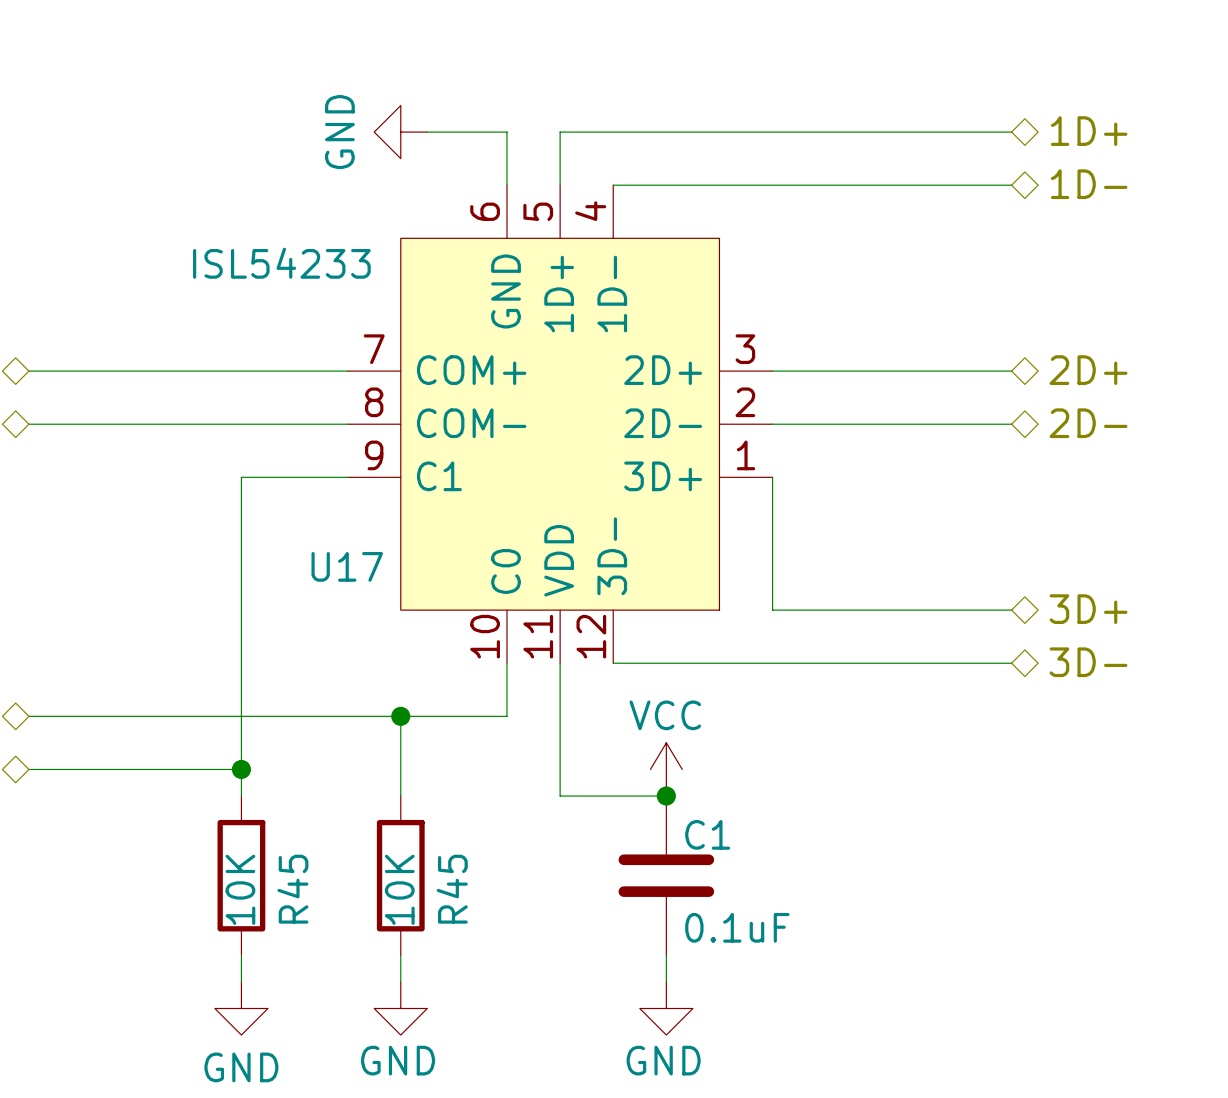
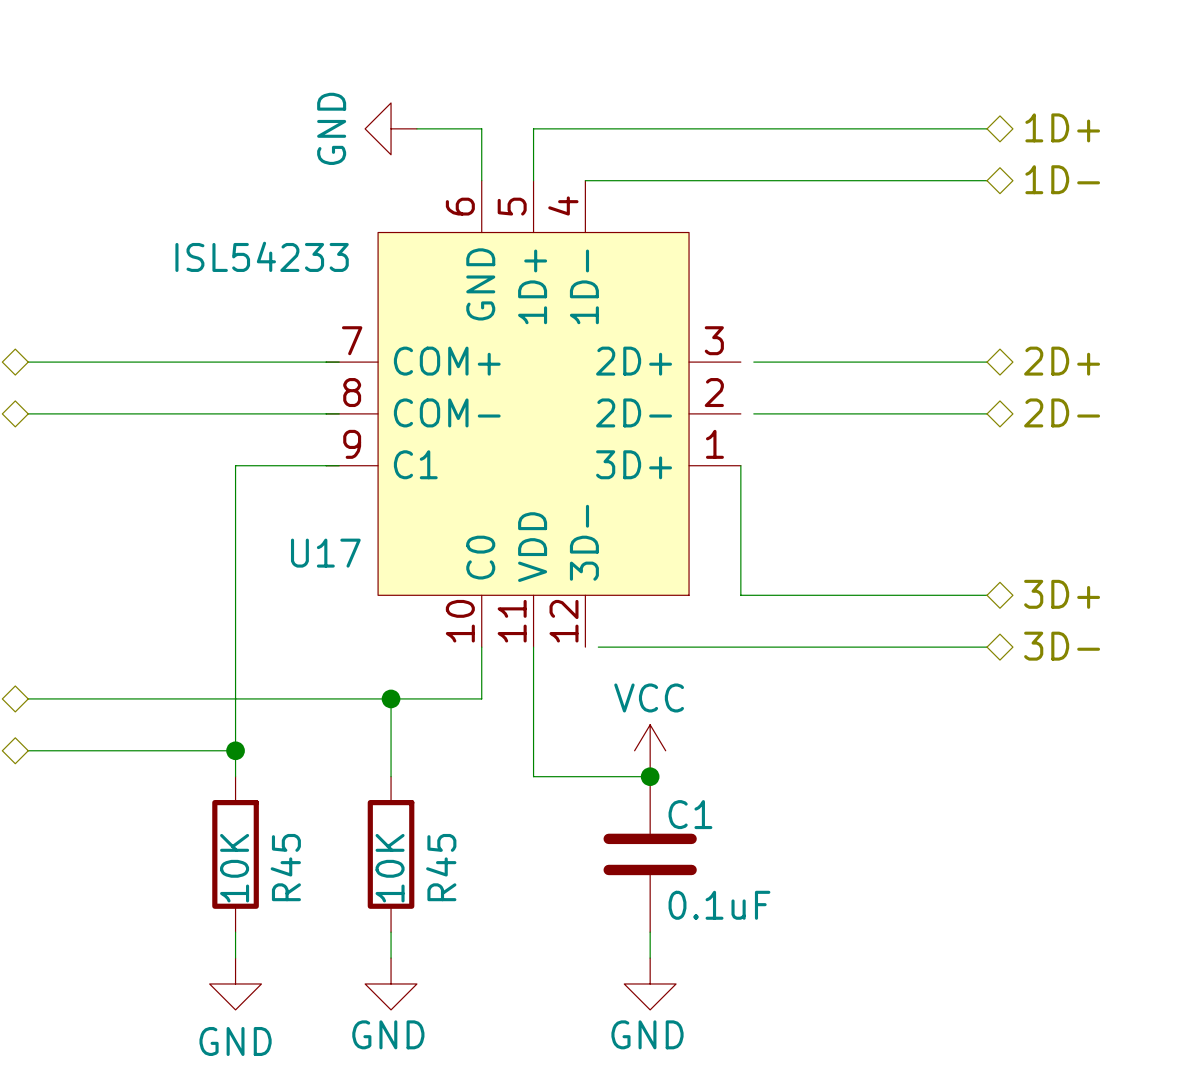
wire: (493, 132) (507, 132) (507, 185) -> (481, 128) (481, 180)
wire: (560, 132) (560, 185) -> (546, 128) (533, 128) (533, 180)
wire: none -> (585, 180) (598, 180)
U17 position: (560, 424) -> (533, 413)
wire: (772, 477) (772, 610) -> (740, 465) (740, 595) (753, 595)
wire: (507, 663) (507, 716) (493, 716) -> (481, 647) (481, 698)
wire: (560, 663) (560, 796) -> (533, 647) (533, 776) (546, 776)

